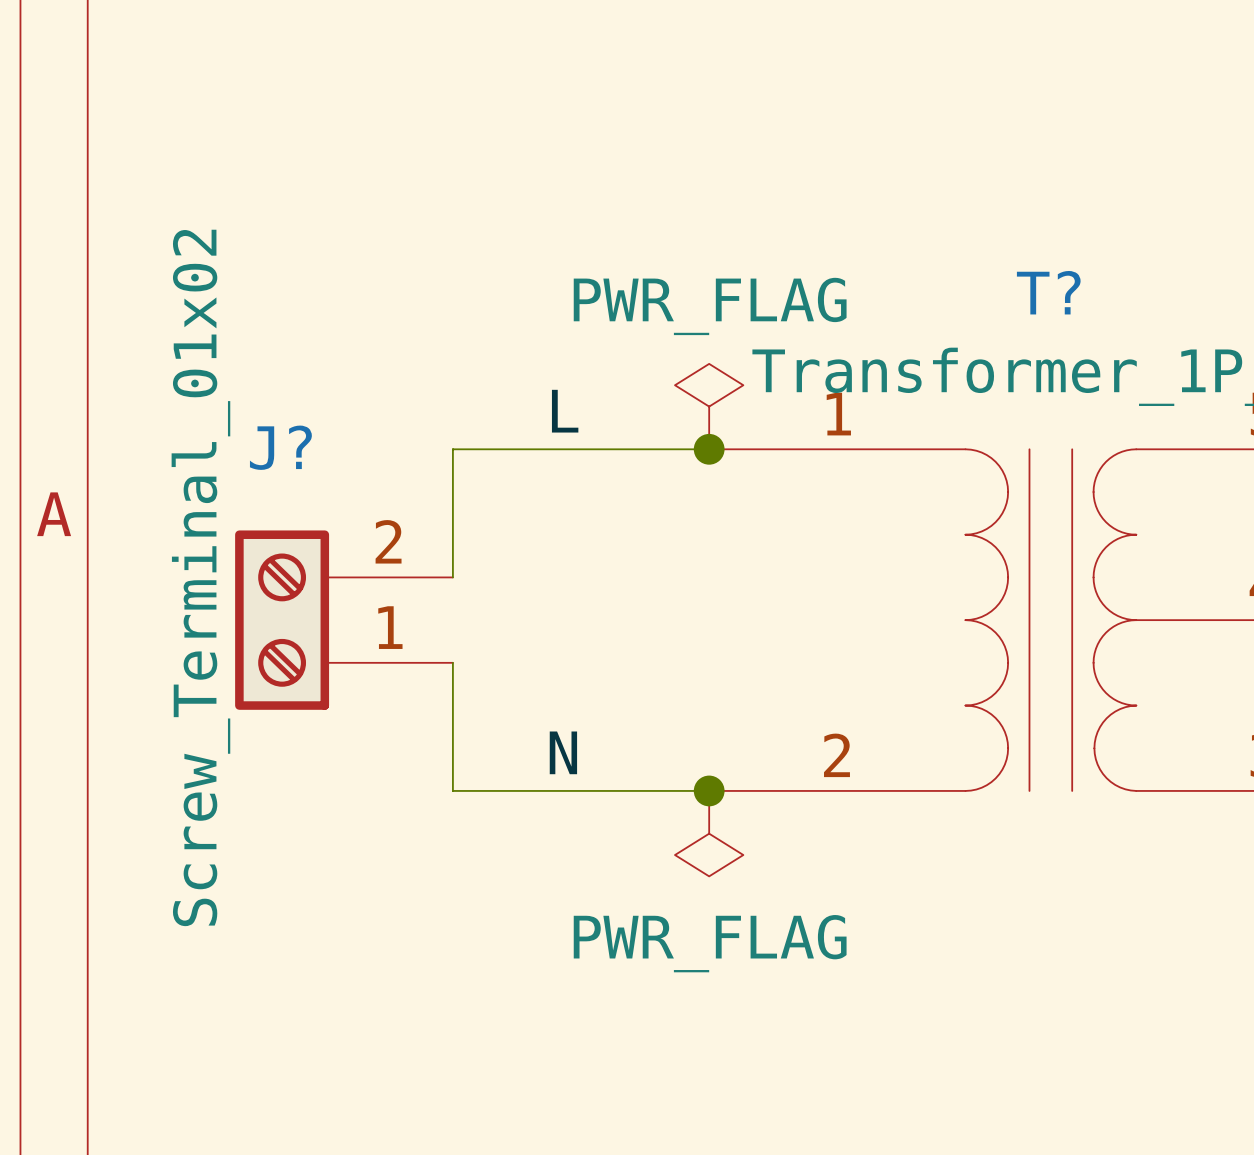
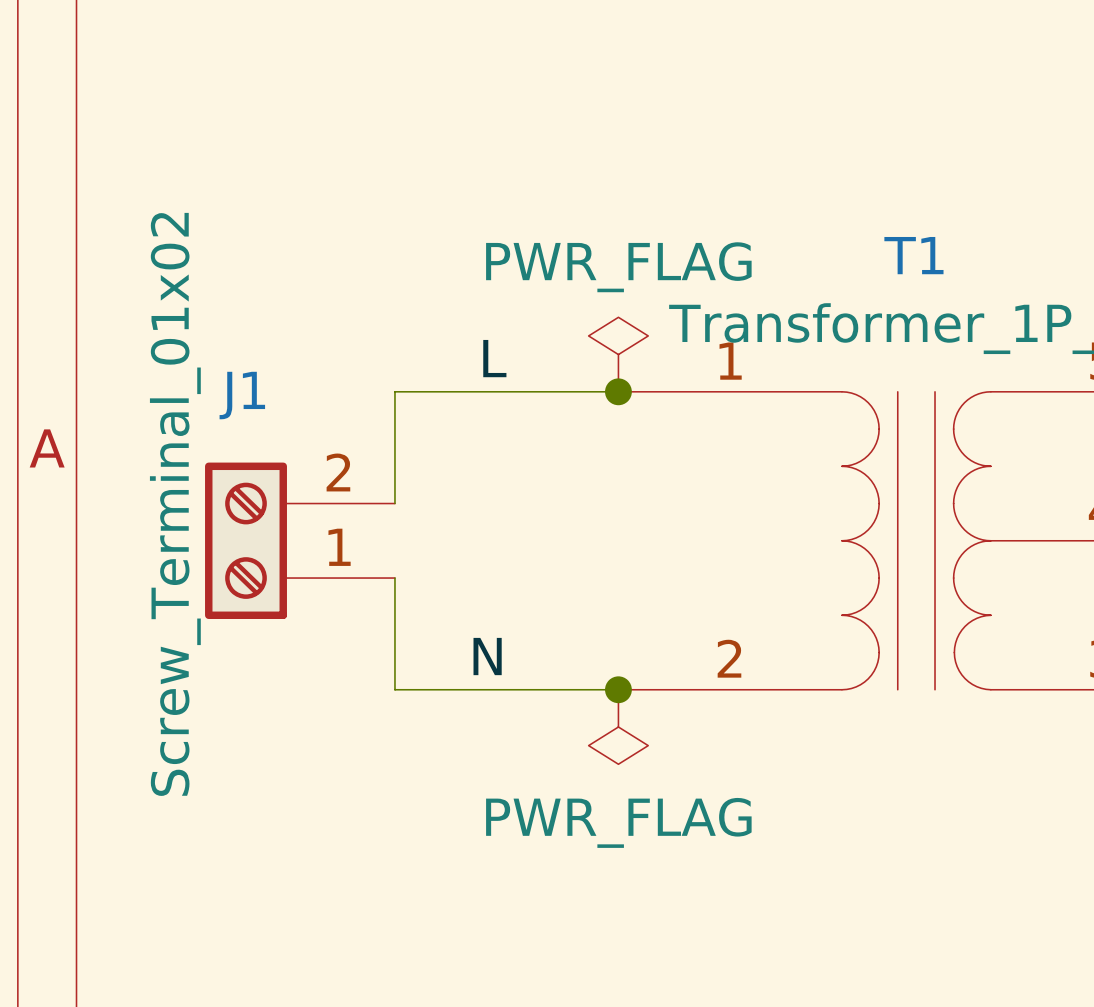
T? name: T? (1048, 292) -> T1 (913, 255)
J? name: J? (280, 447) -> J1 (242, 395)

